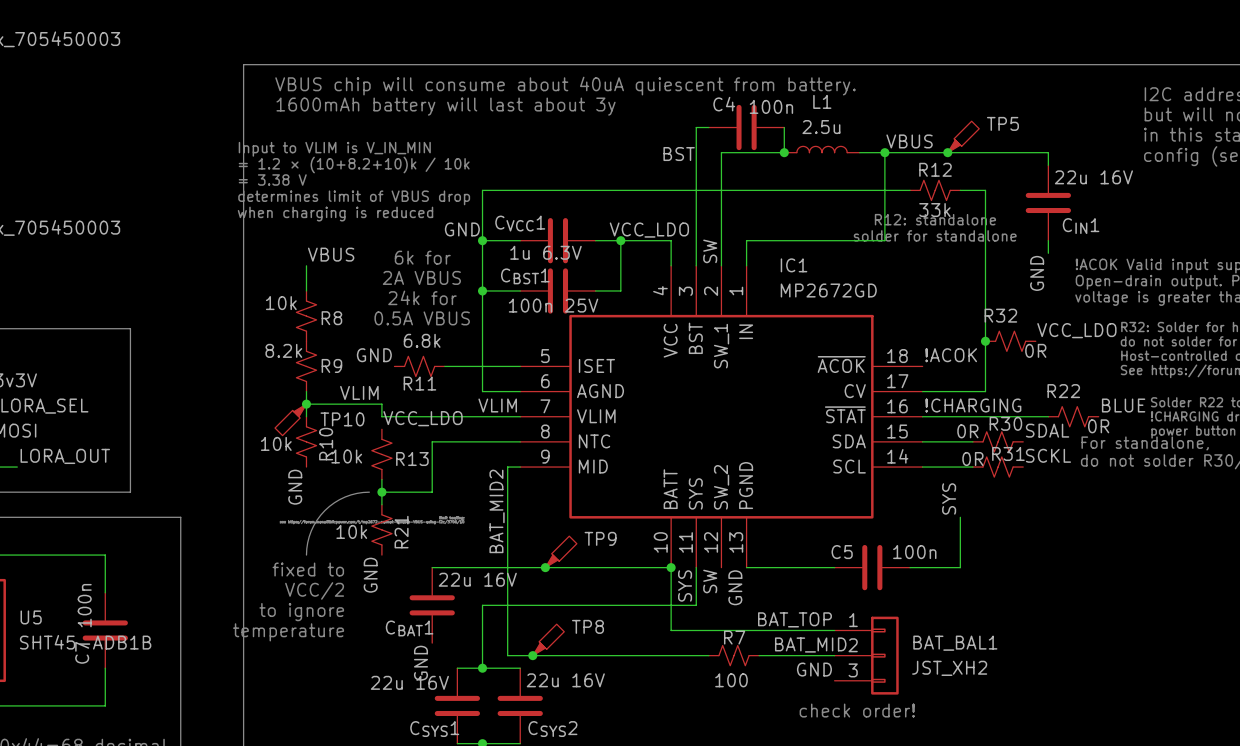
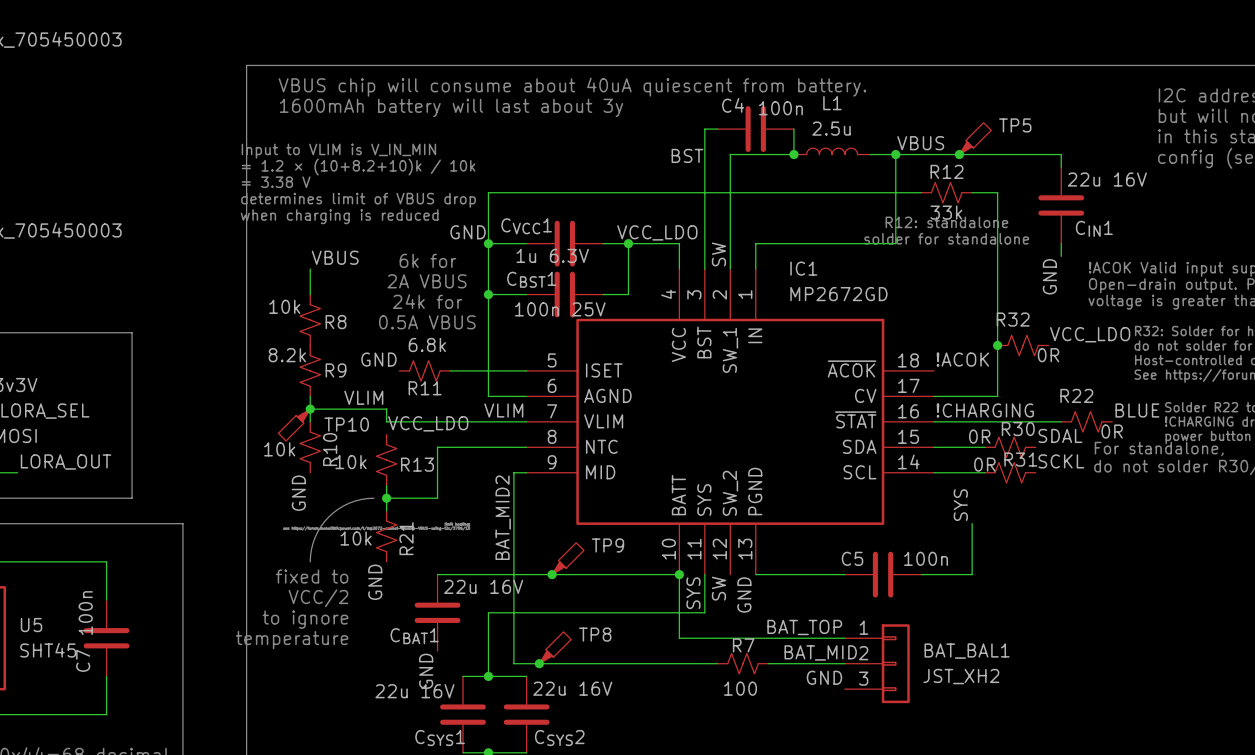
U5 value: SHT45-ADB1B (85, 642) -> SHT45 (48, 650)
text: check order! (857, 710) -> none

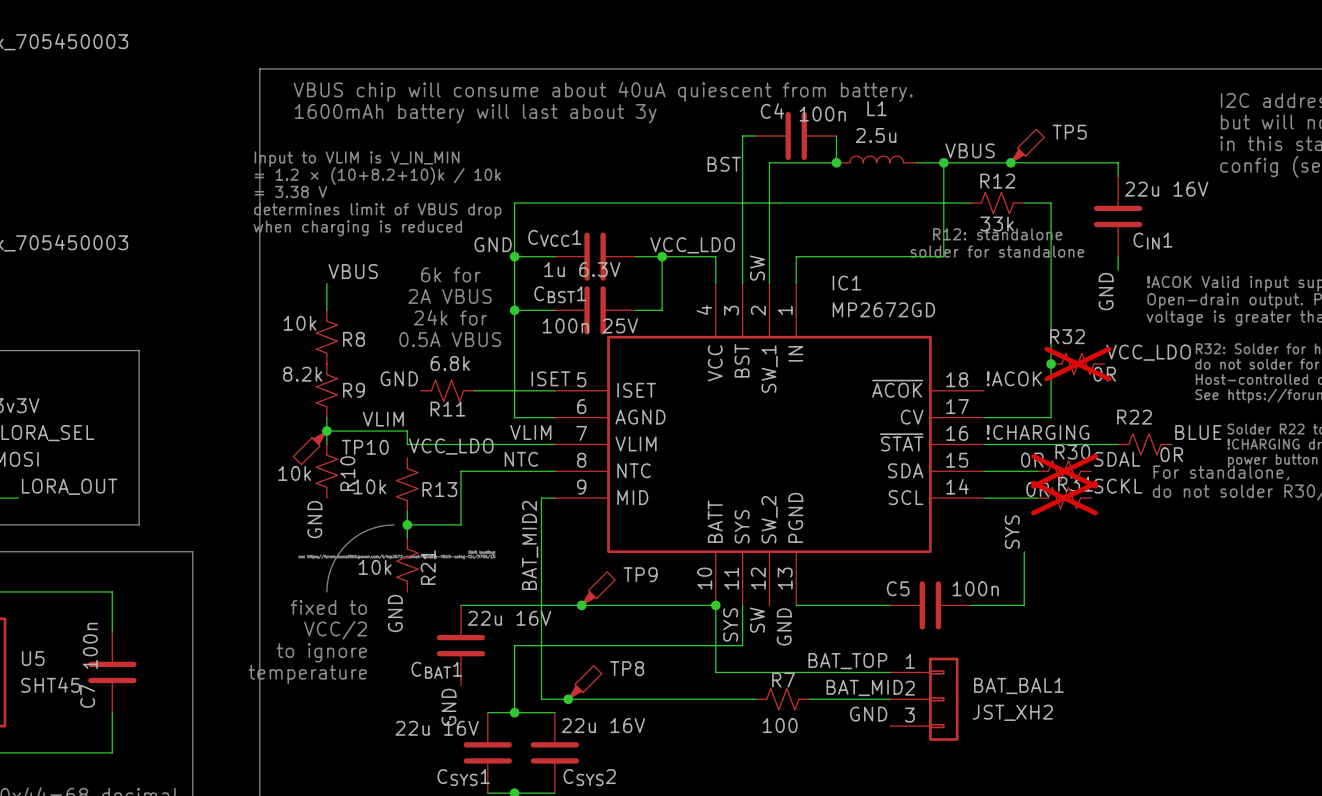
R32 do-not-place cross: none -> (1077, 363)
label: none -> ISET (550, 378)
label: none -> NTC (521, 459)
R30 do-not-place cross: none -> (1064, 471)
R31 do-not-place cross: none -> (1064, 498)

